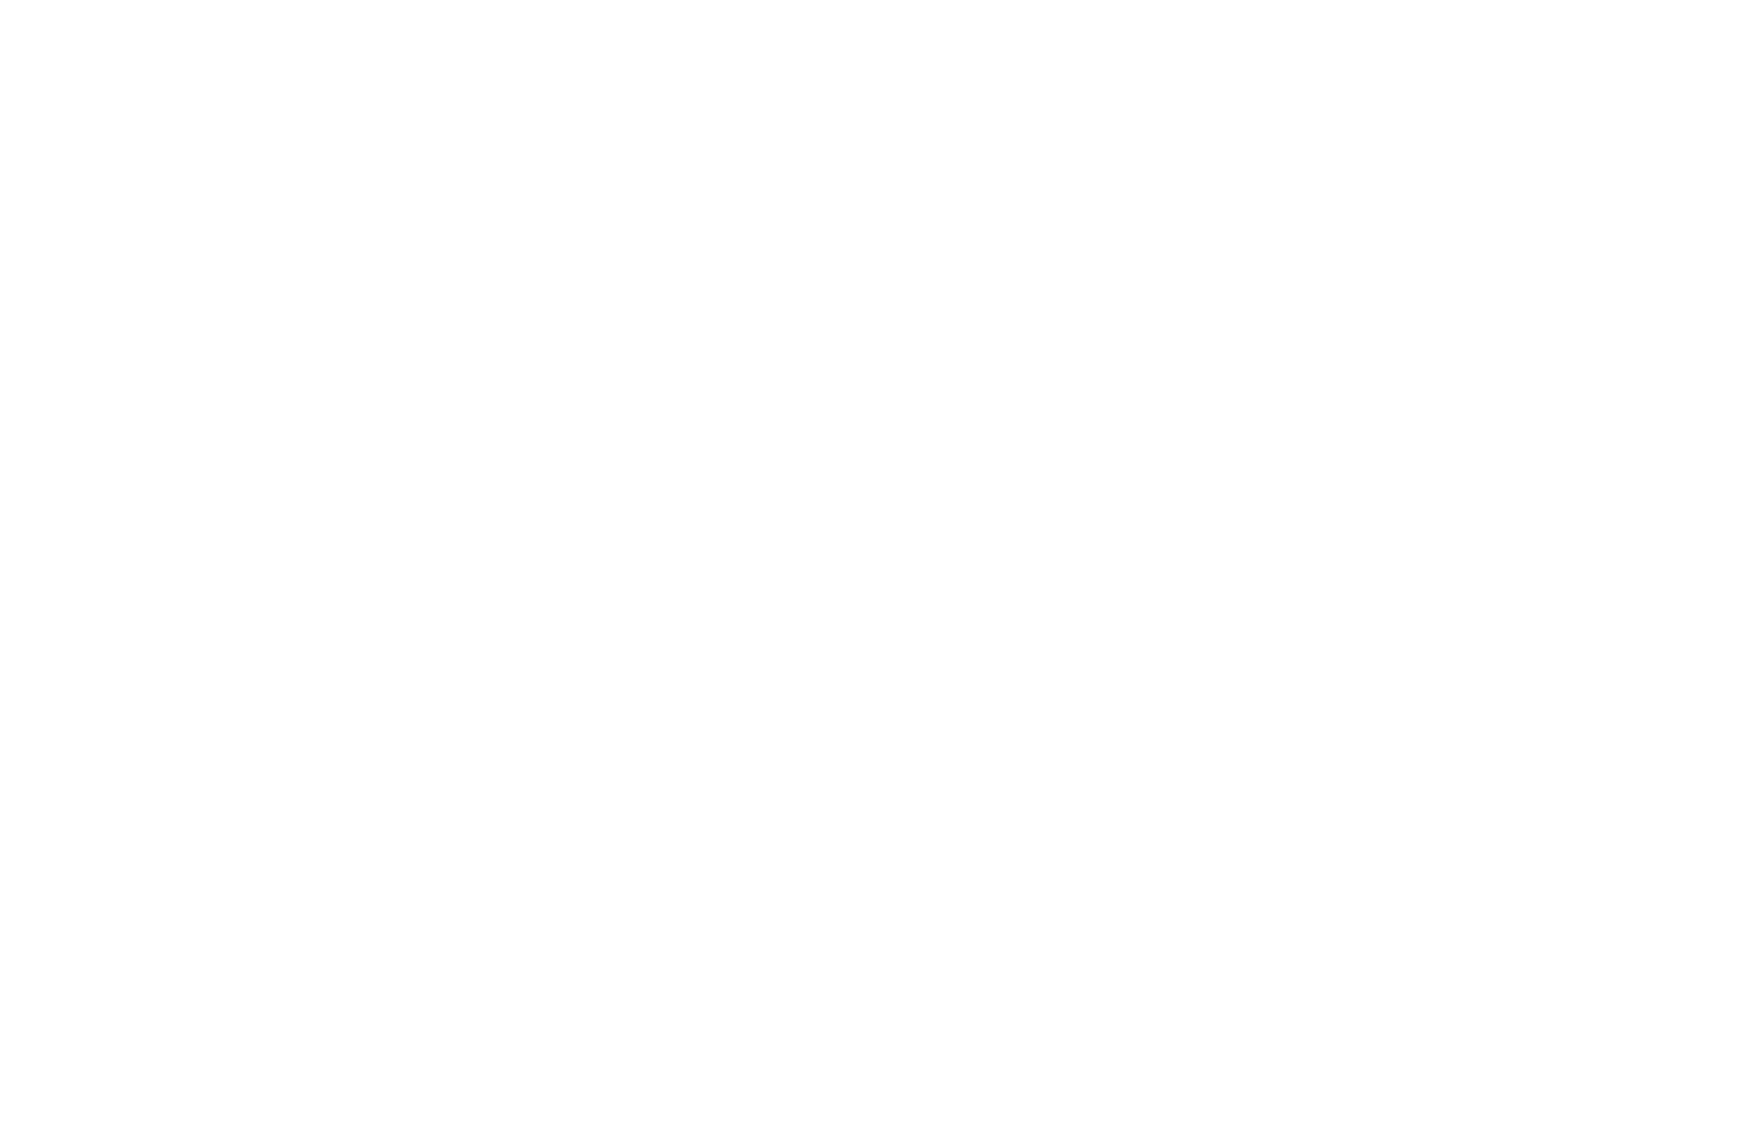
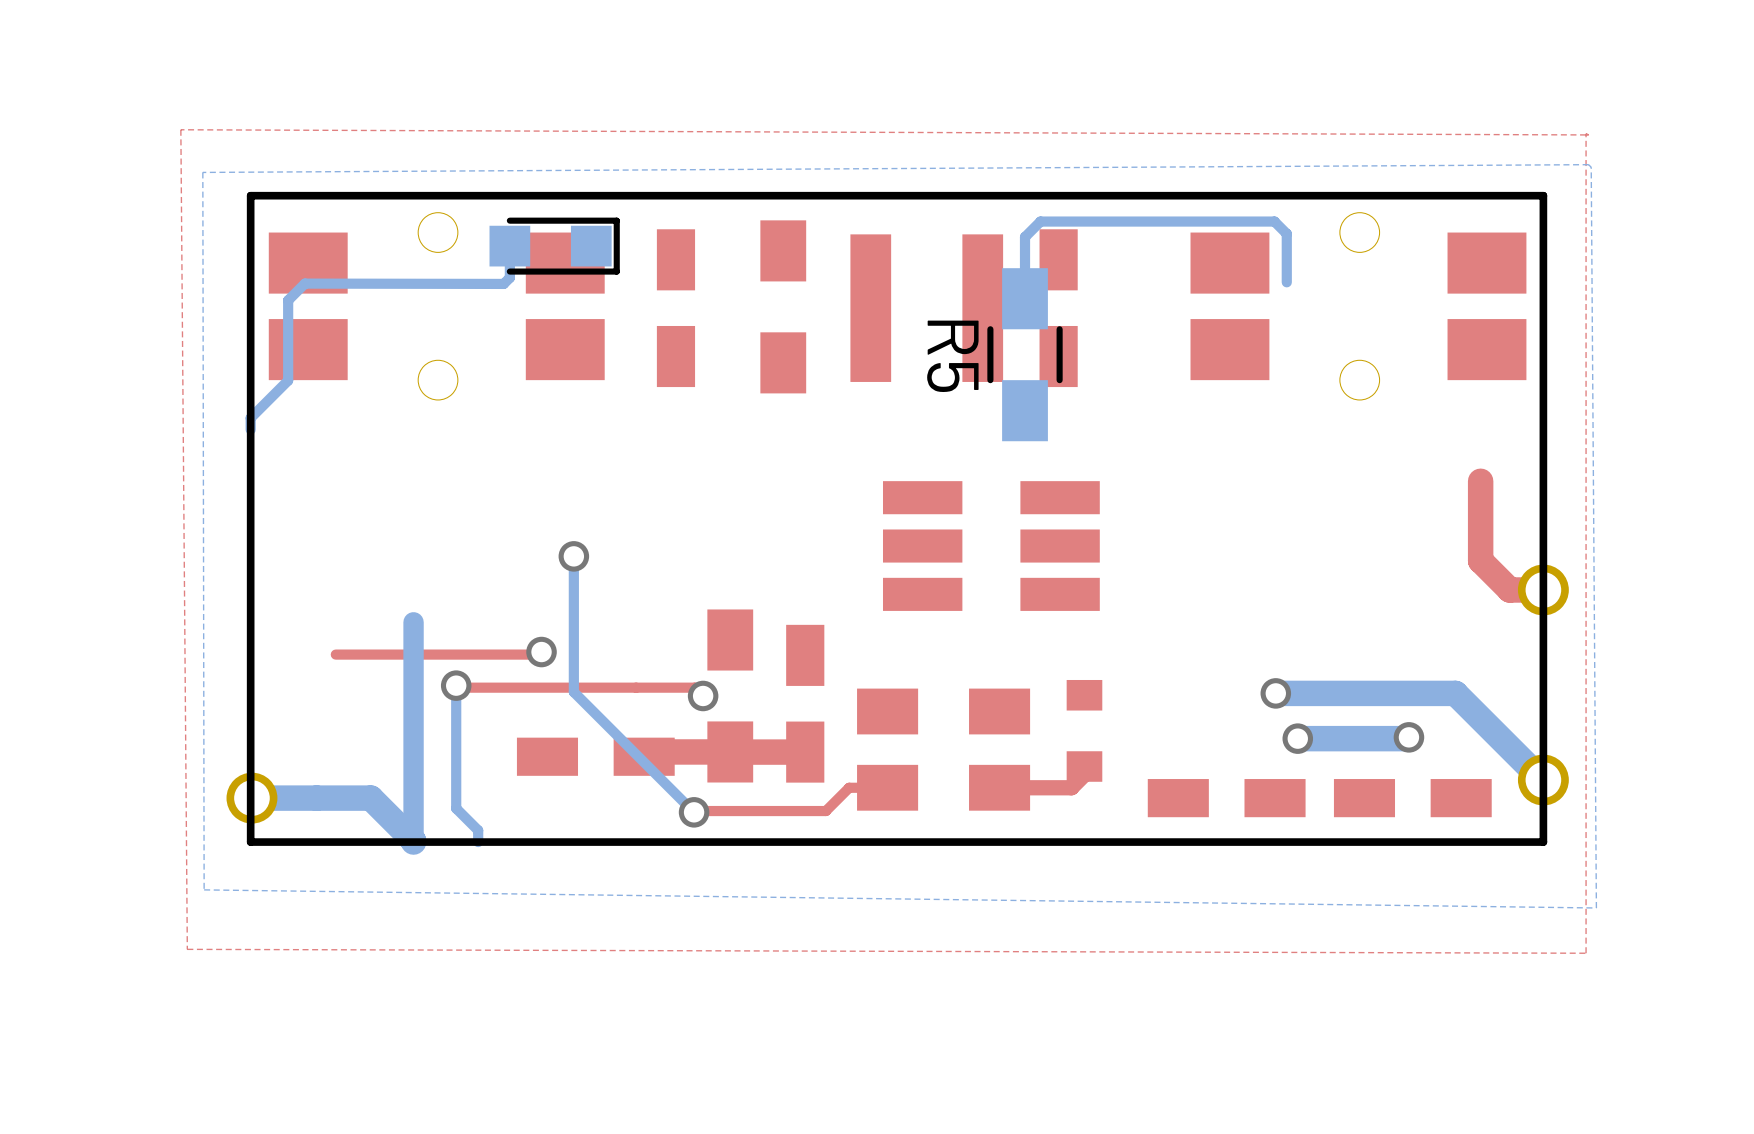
top zone outline: none -> (180, 129) (1588, 134) (1586, 133) (1586, 953) (187, 949) (180, 129)
bottom zone outline: none -> (1588, 164) (202, 172) (204, 889) (1596, 907) (1591, 167) (1588, 164)
board edge: none -> (1543, 195) (1543, 842) (250, 842) (250, 195) (1543, 195)
bottom track: none -> (509, 246) (509, 277) (503, 283) (304, 283) (288, 300) (288, 380) (250, 418) (250, 429)
part: none -> (554, 246)
bottom track: none -> (1286, 282) (1286, 233) (1274, 221) (1040, 221) (1025, 237) (1025, 298)
part: none -> (436, 306)
part: none -> (783, 306)
part: none -> (1358, 306)
part: none -> (675, 308)
part: none -> (926, 308)
part: none -> (1058, 308)
R5: none -> (1025, 354)
top track: none -> (1480, 481) (1480, 560) (1509, 589) (1543, 589)
part: none -> (991, 546)
bottom track: none -> (573, 556) (573, 692) (694, 812)
via: none -> (573, 556)
part: none -> (1543, 589)
bottom track: none -> (413, 622) (413, 842) (370, 798) (251, 798)
top track: none -> (541, 652) (538, 654) (335, 654)
via: none -> (541, 652)
top track: none -> (456, 685) (458, 687) (694, 687) (703, 695)
bottom track: none -> (456, 685) (456, 808) (478, 830) (478, 842)
via: none -> (456, 685)
bottom track: none -> (1275, 693) (1455, 693) (1542, 780)
via: none -> (1275, 693)
via: none -> (703, 695)
part: none -> (730, 695)
part: none -> (805, 703)
part: none -> (943, 711)
part: none -> (1084, 730)
bottom track: none -> (1408, 737) (1297, 738)
via: none -> (1408, 737)
via: none -> (1297, 738)
part: none -> (595, 756)
top track: none -> (1084, 766) (1084, 774) (1071, 787) (999, 787)
part: none -> (1543, 780)
part: none -> (943, 787)
part: none -> (251, 798)
top track: none -> (887, 798) (887, 787) (849, 787) (825, 811) (694, 812)
part: none -> (1226, 798)
part: none -> (1412, 798)
via: none -> (694, 812)

